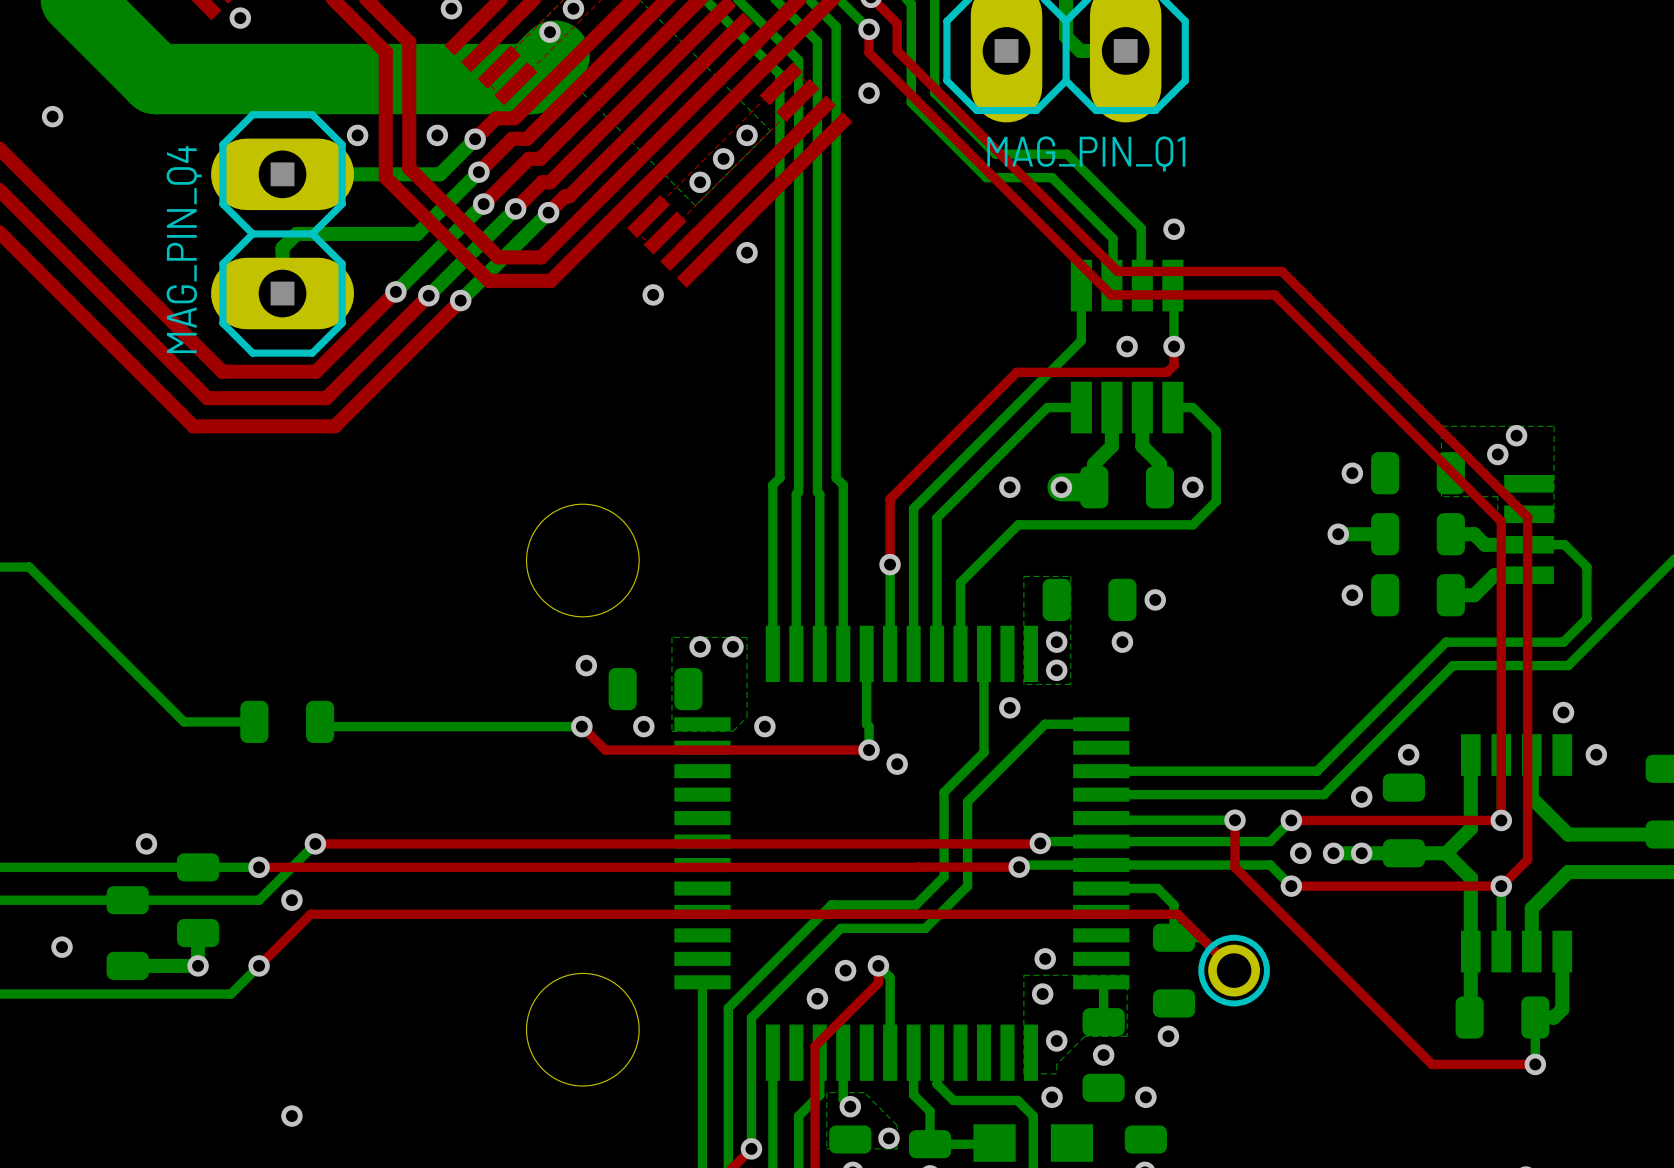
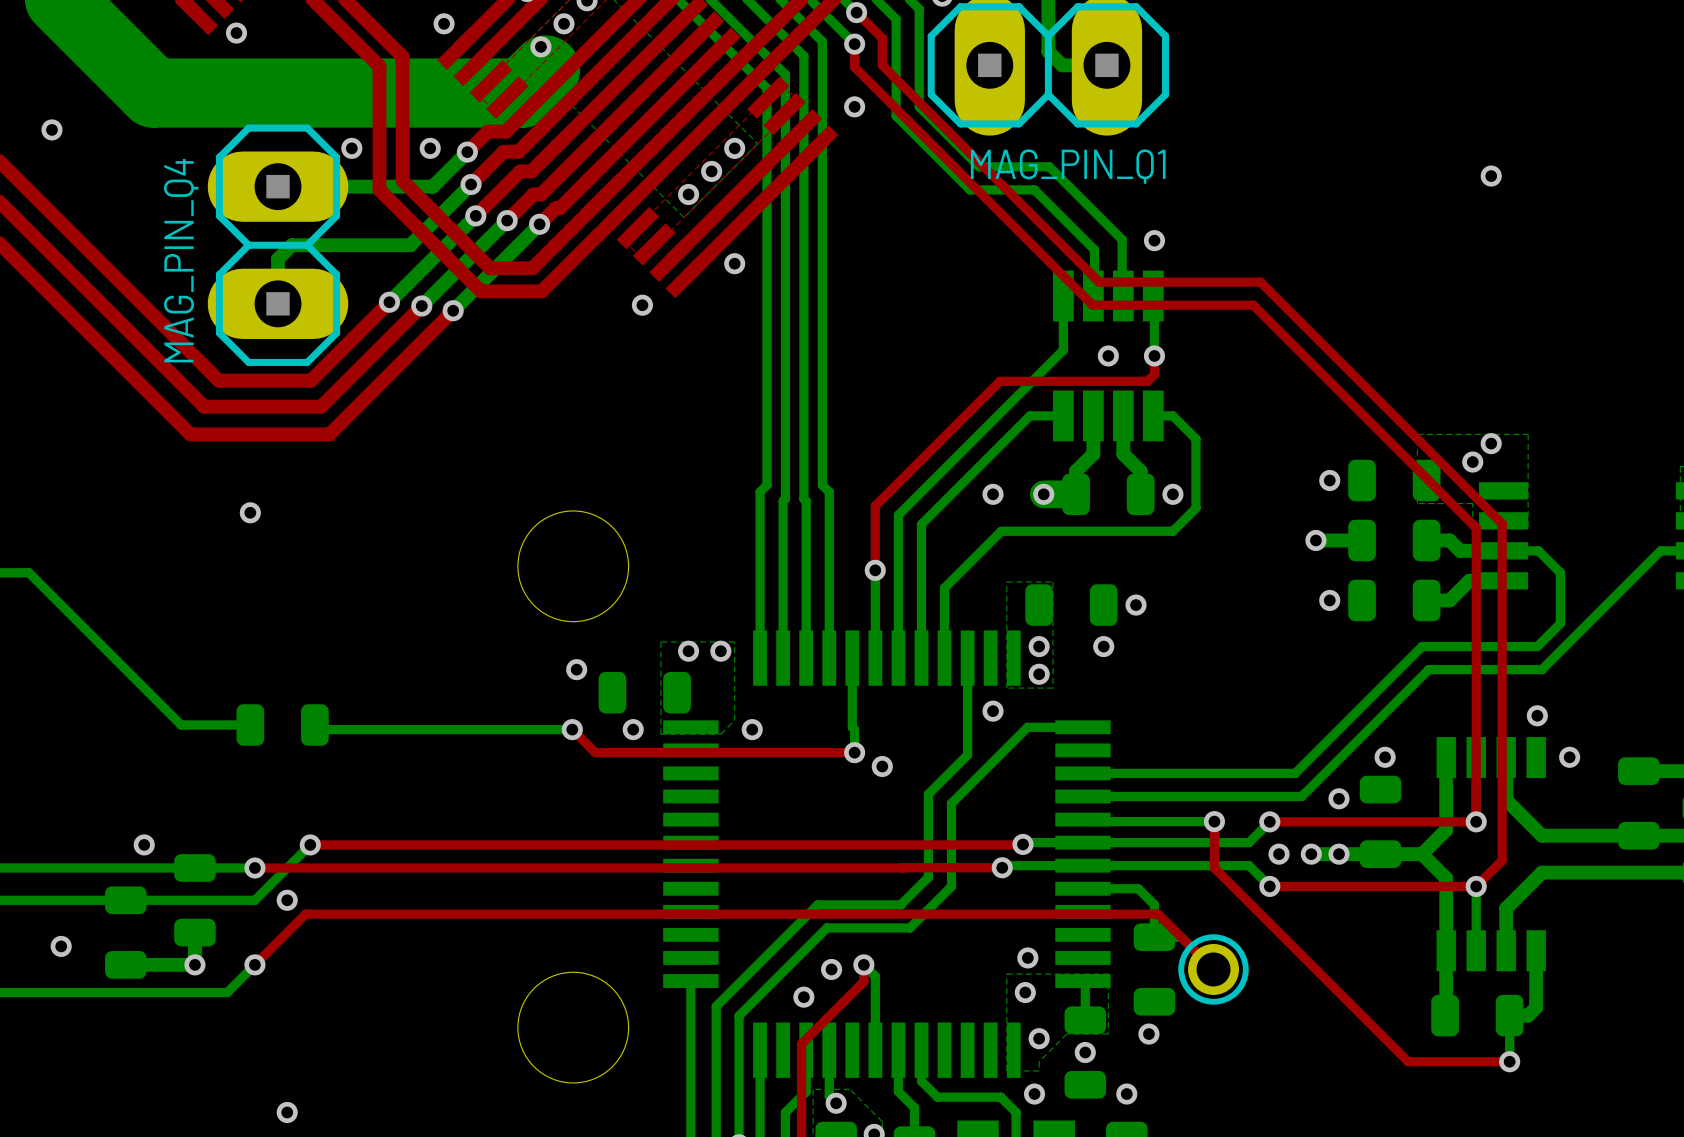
via: none -> (1491, 176)
via: none -> (250, 512)

